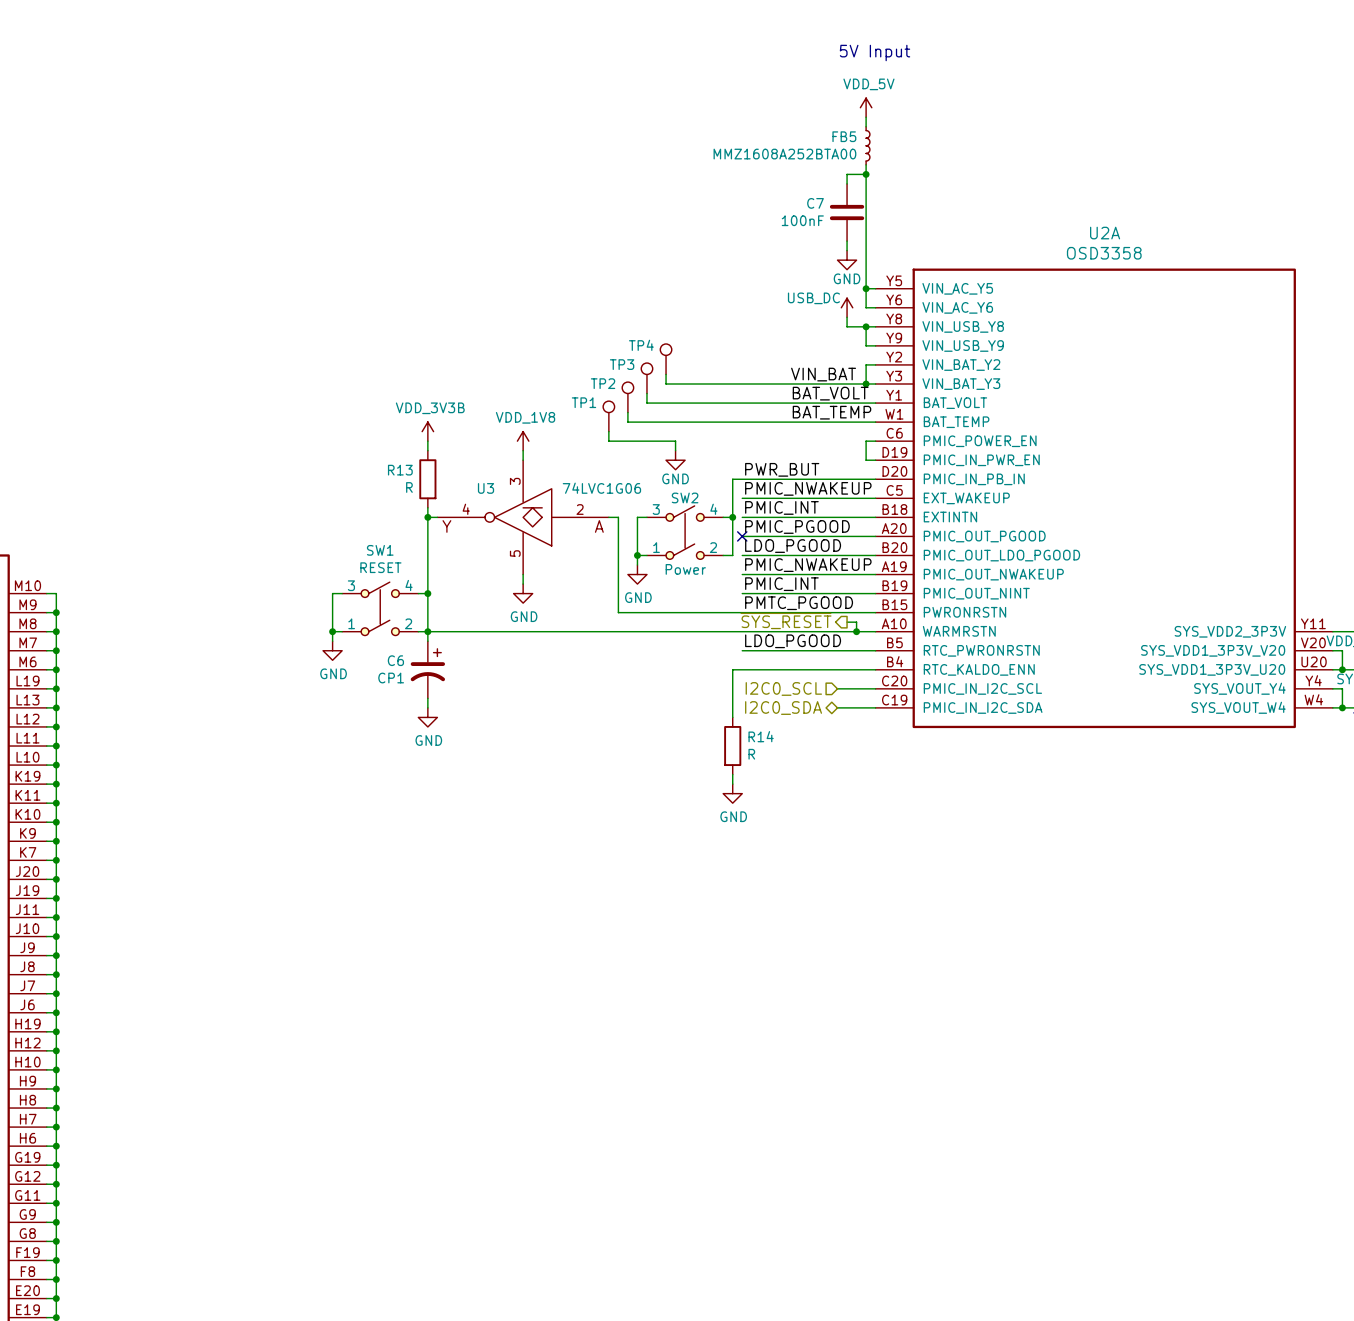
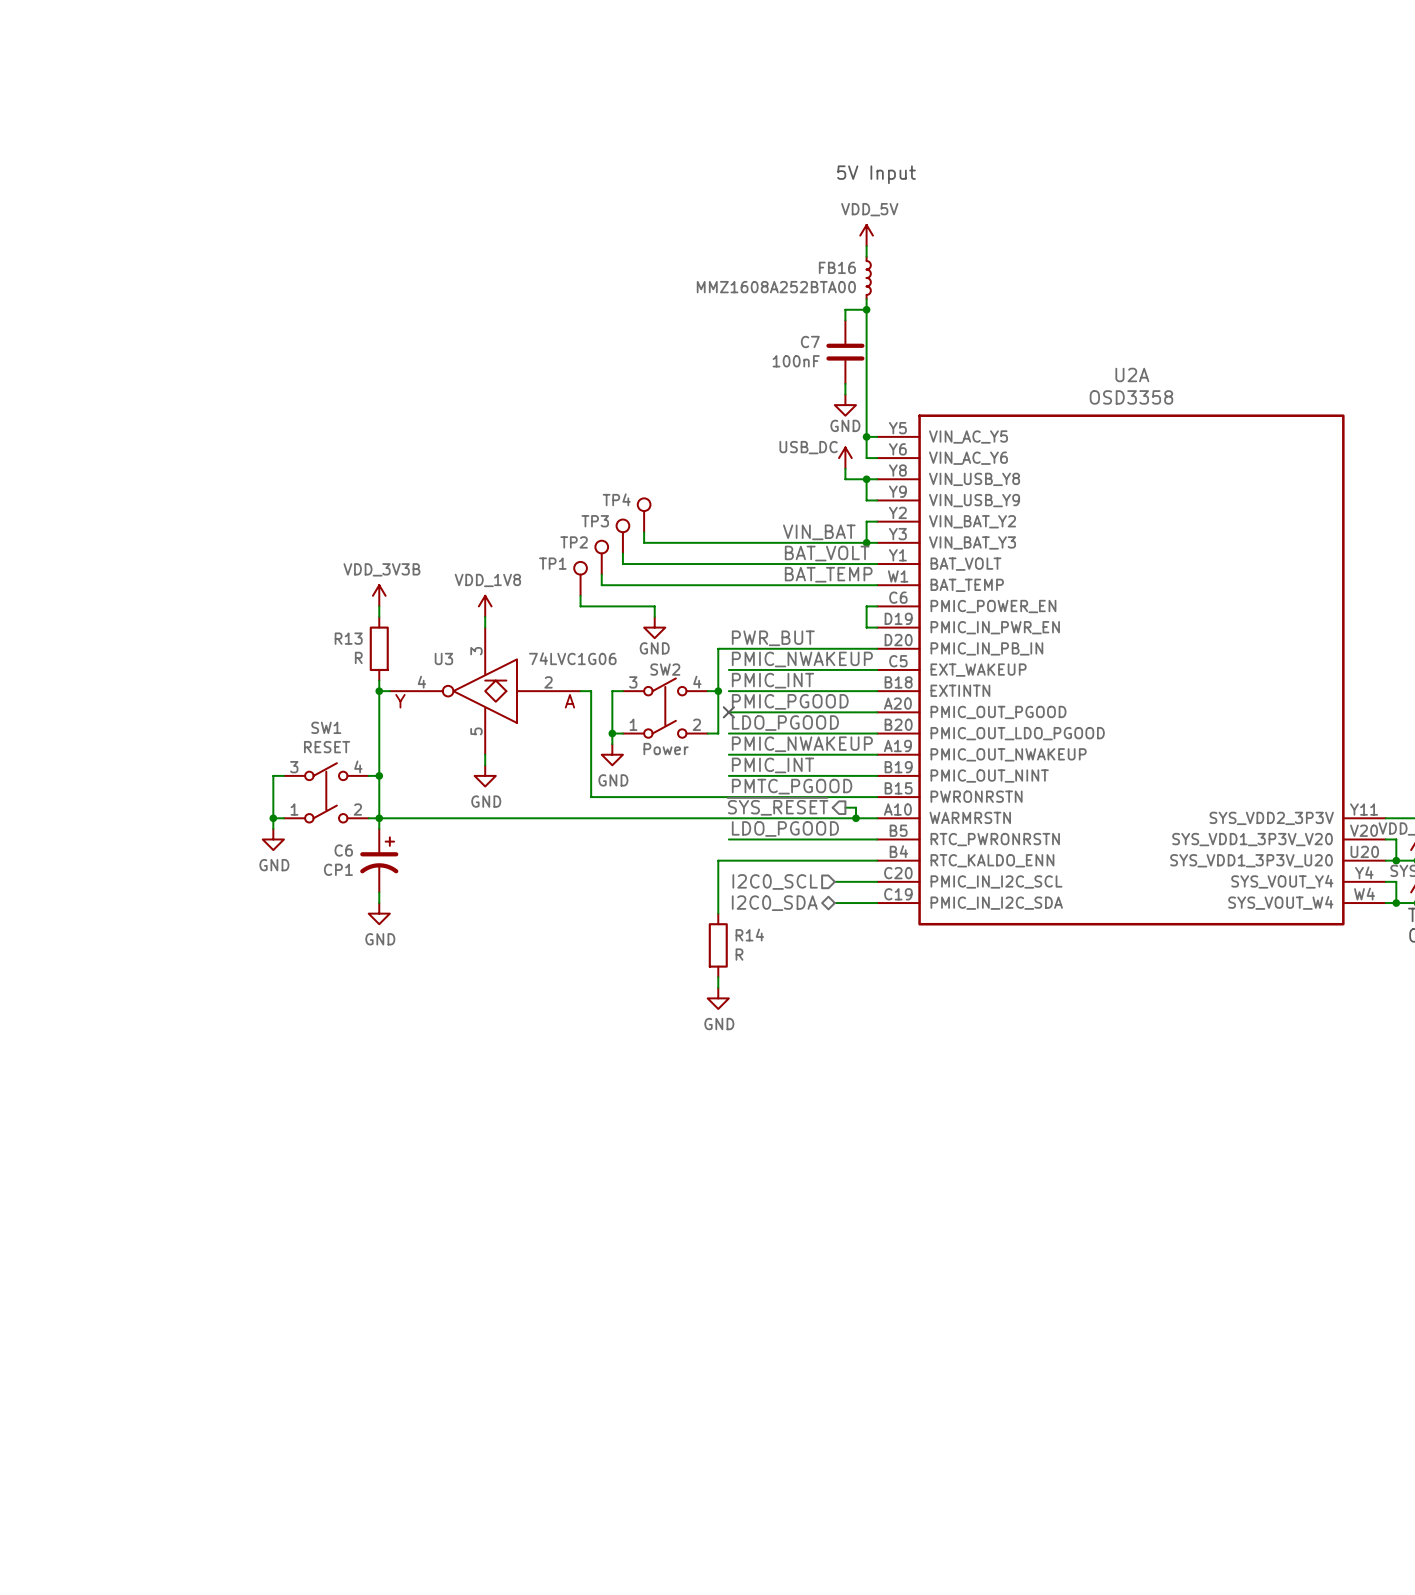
FB5 name: FB5 (844, 136) -> FB16 (837, 267)

